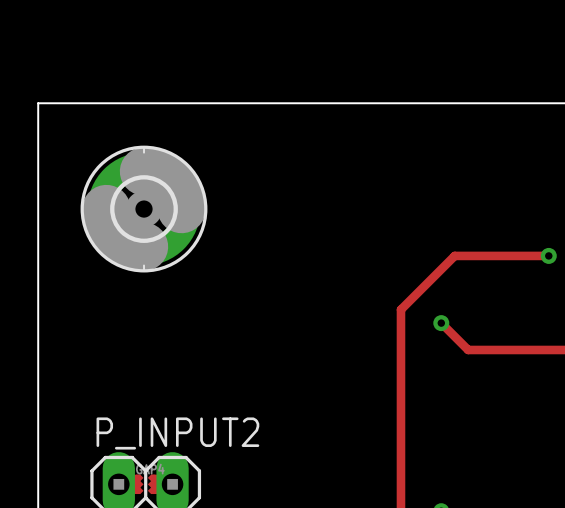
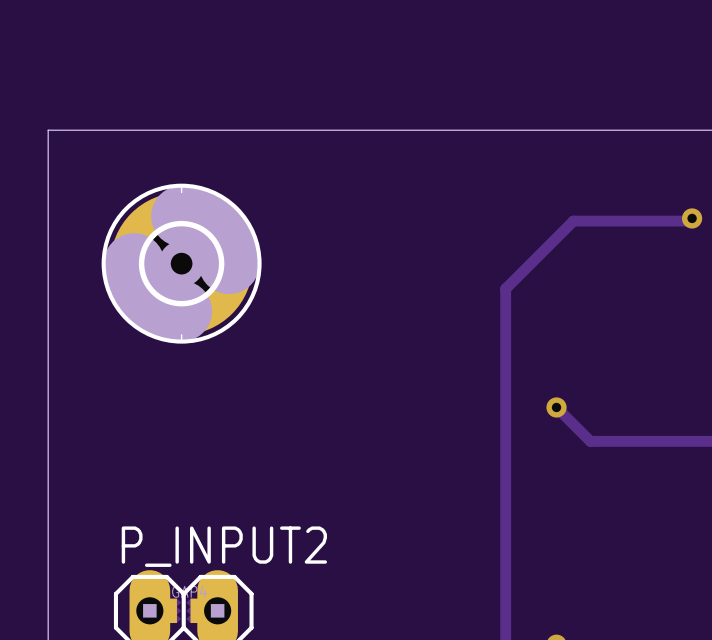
track: (548, 255) (454, 255) (400, 309) -> (692, 218) (689, 221) (573, 221) (505, 288) (505, 390)
via position: (548, 255) -> (692, 218)

